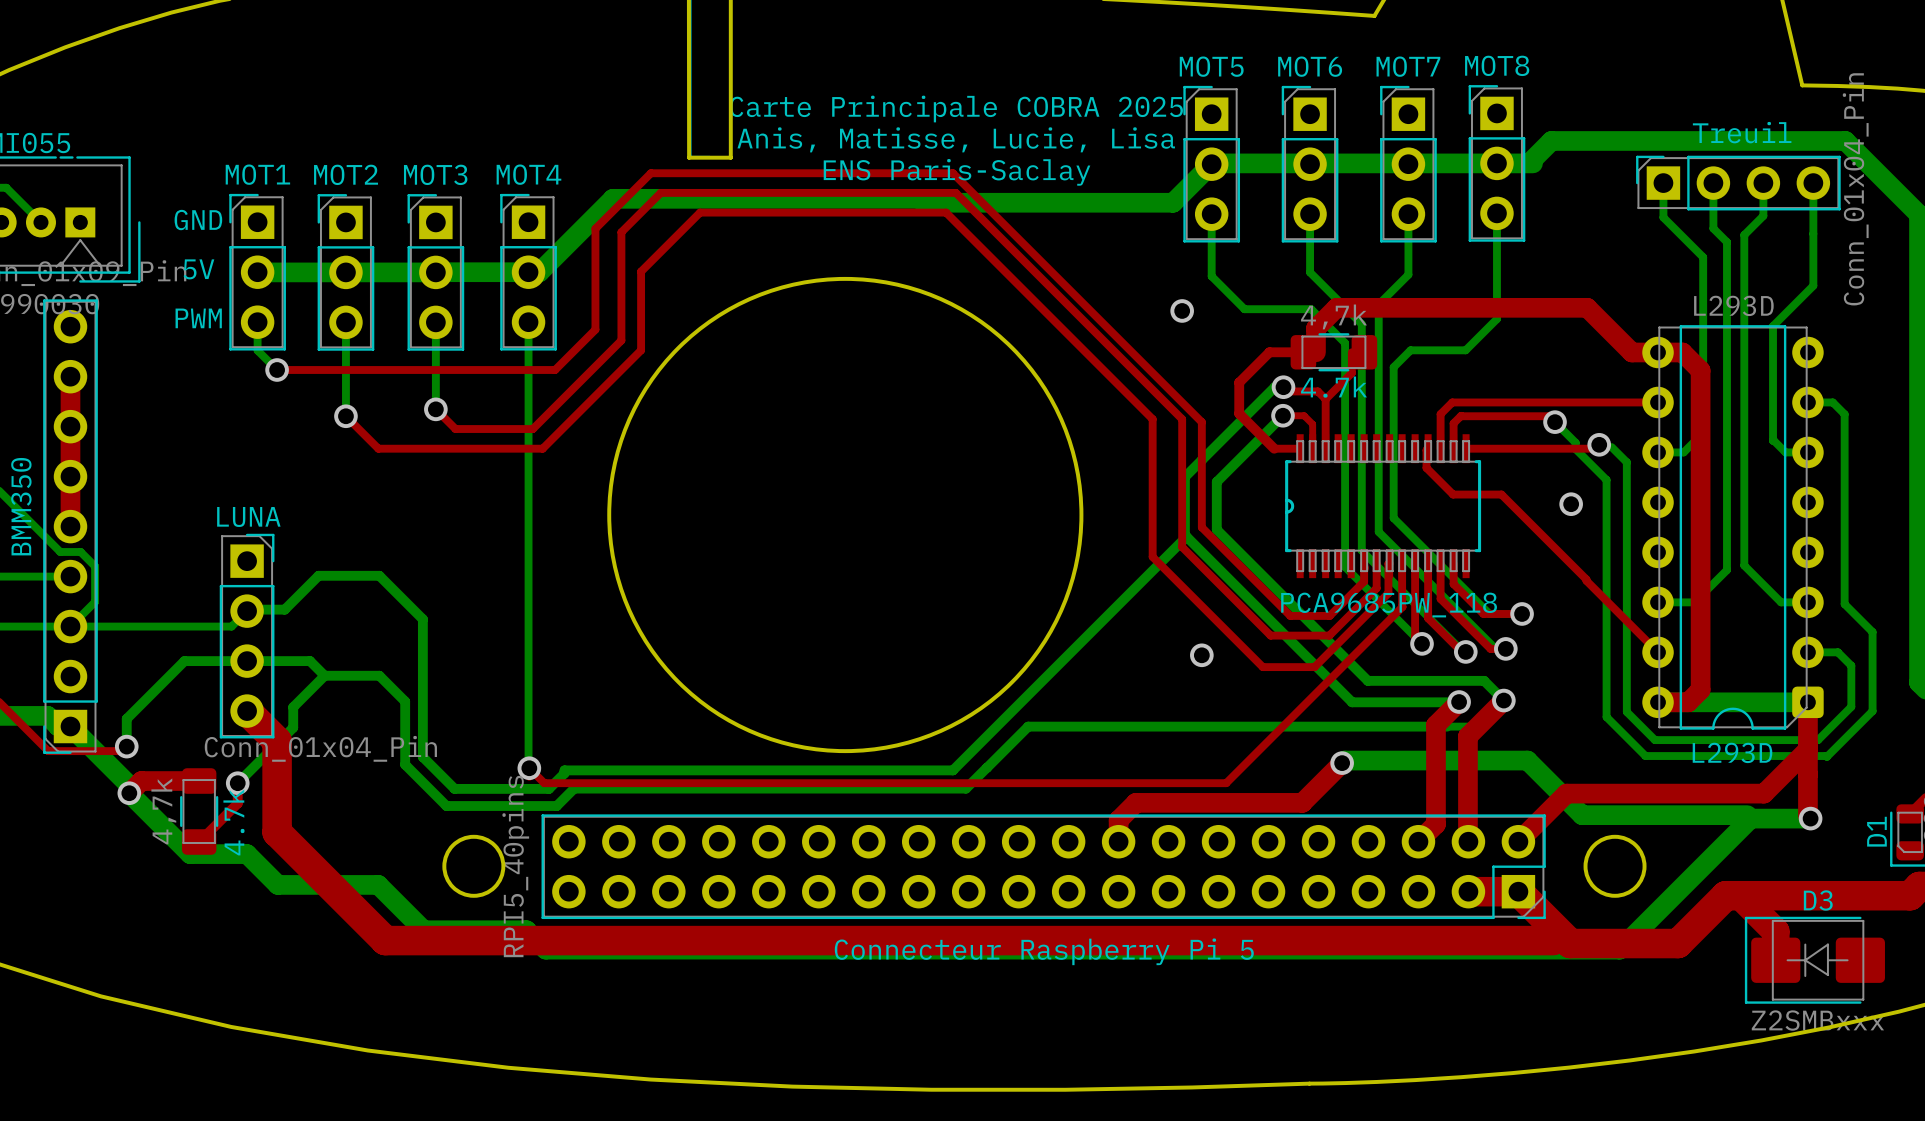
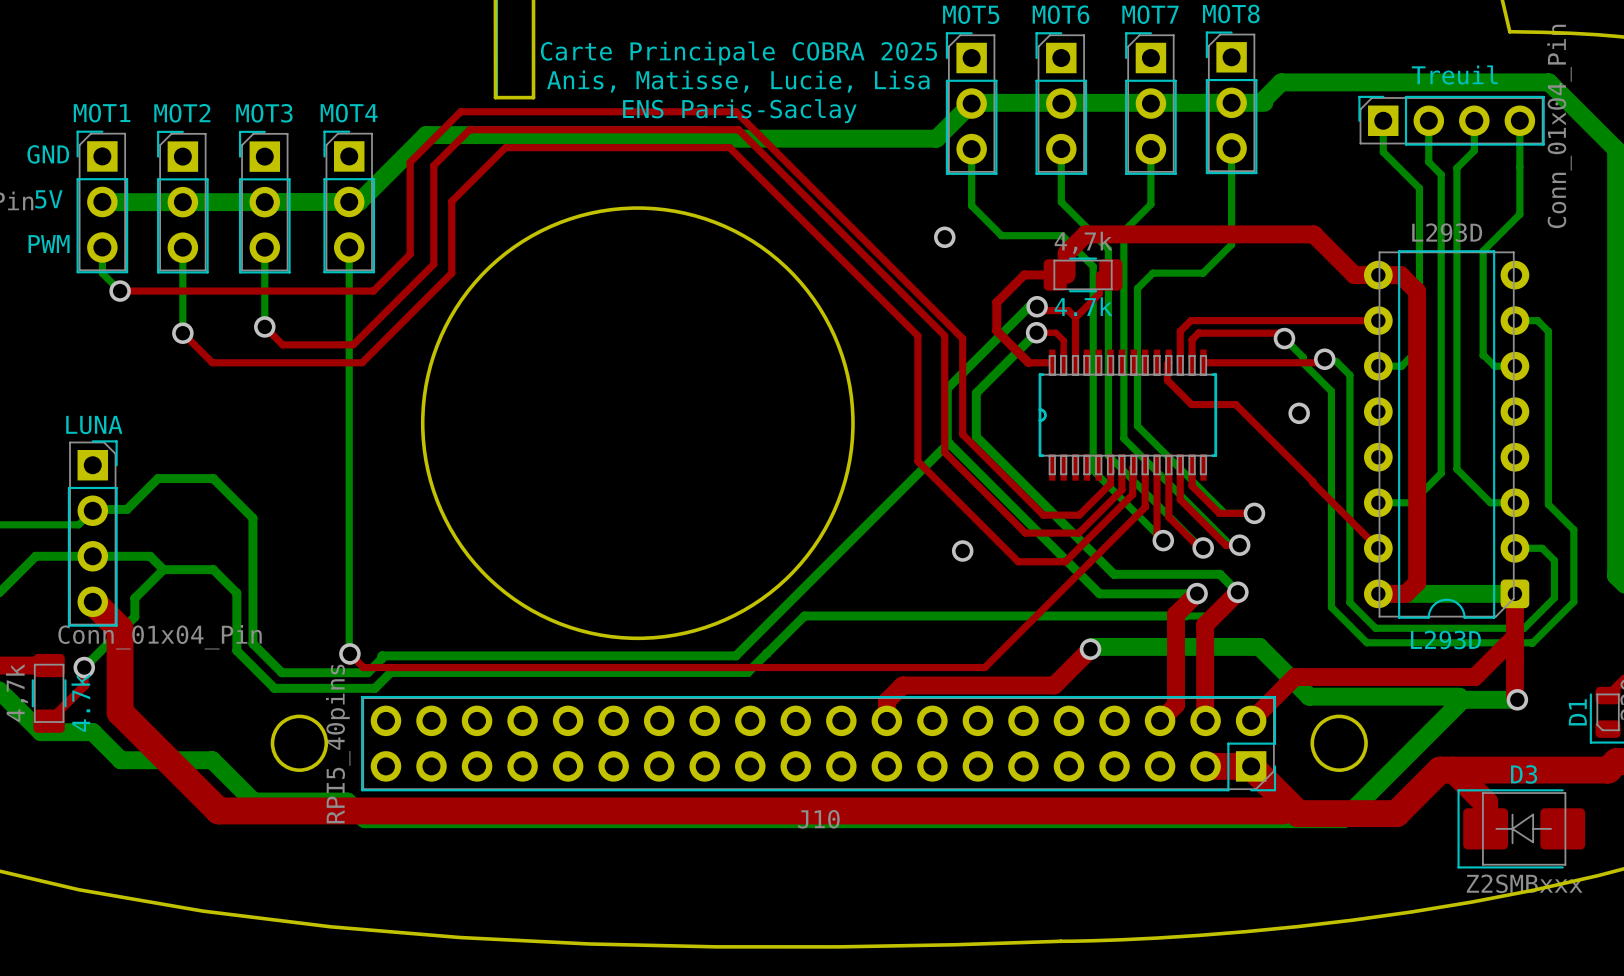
text: PCA9685PW_118 (1389, 605) -> none
J10 name: none -> J10 (818, 819)
J10 text: Connecteur Raspberry Pi 5 (1044, 951) -> none

